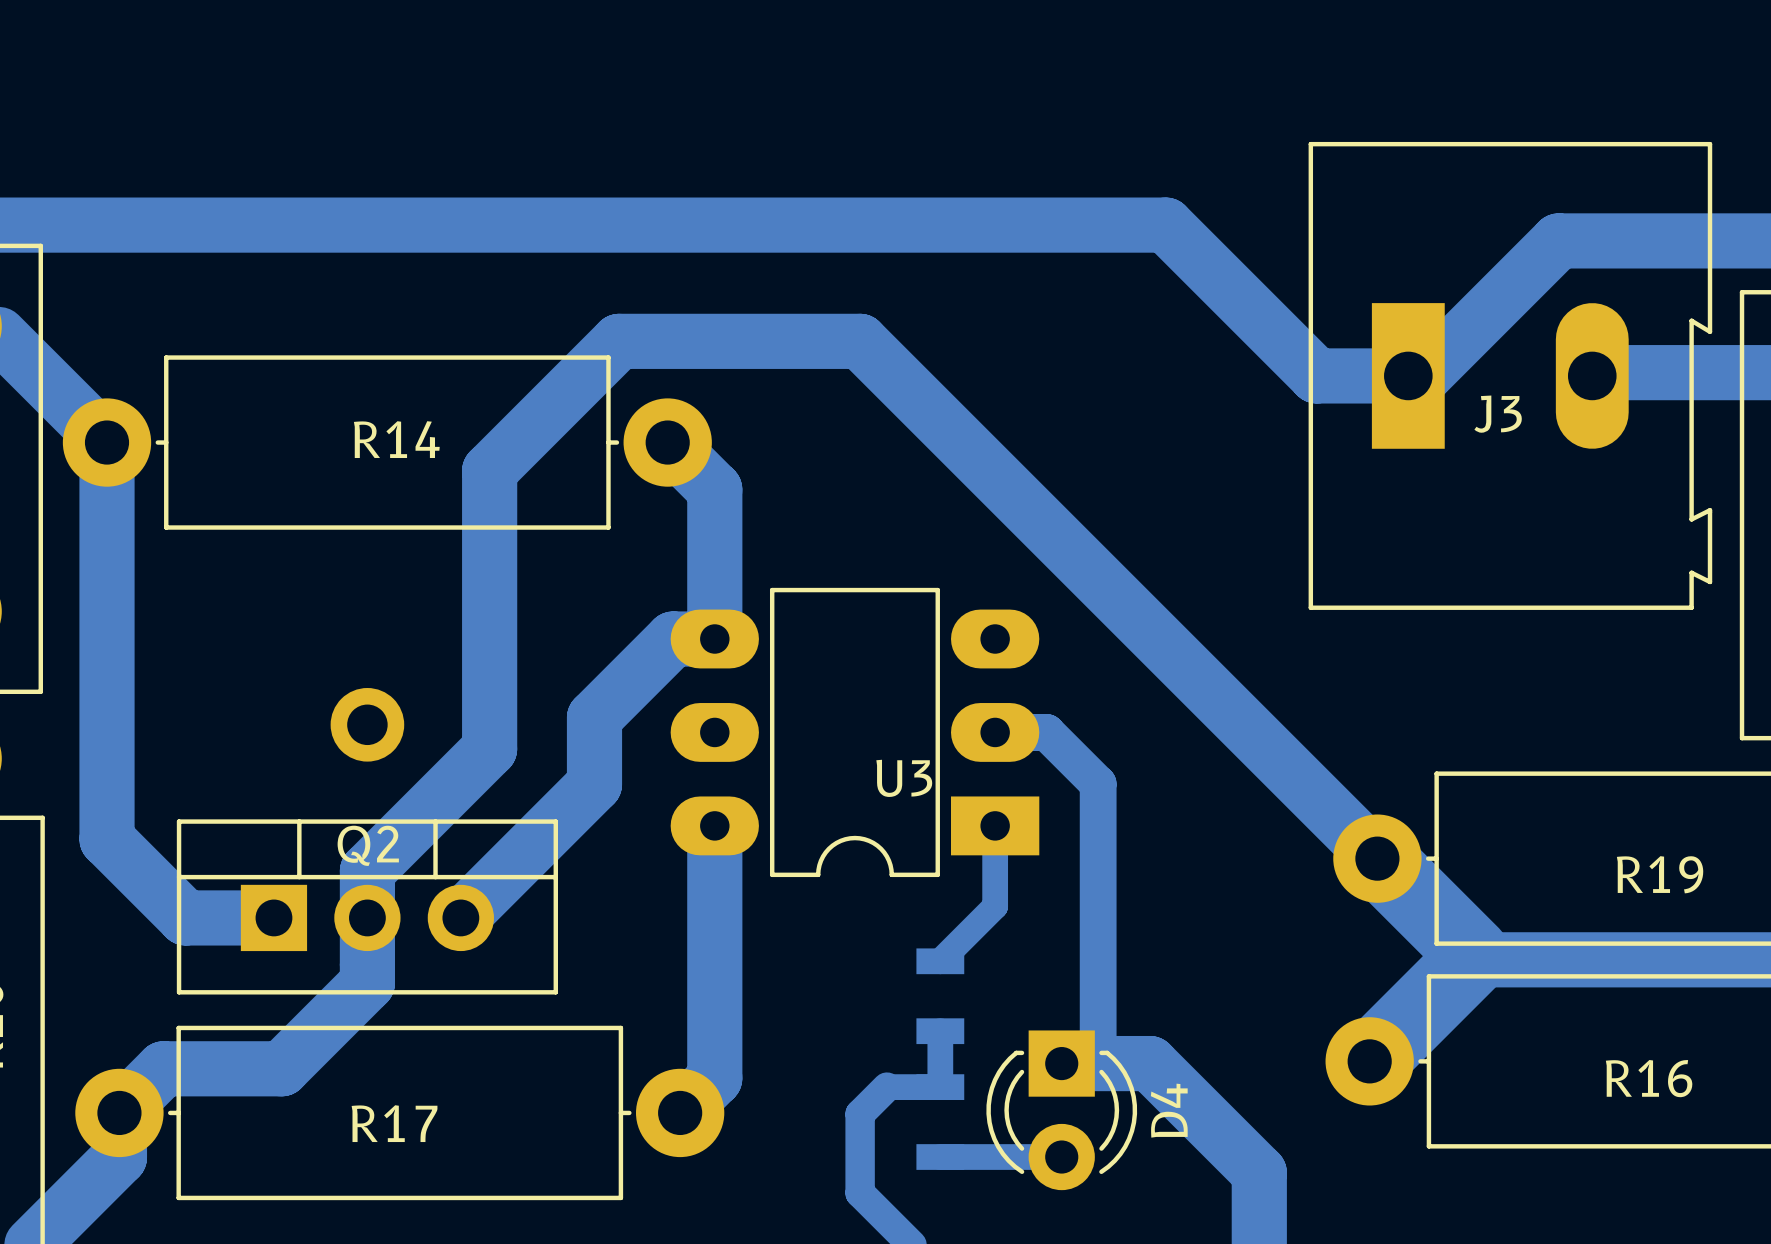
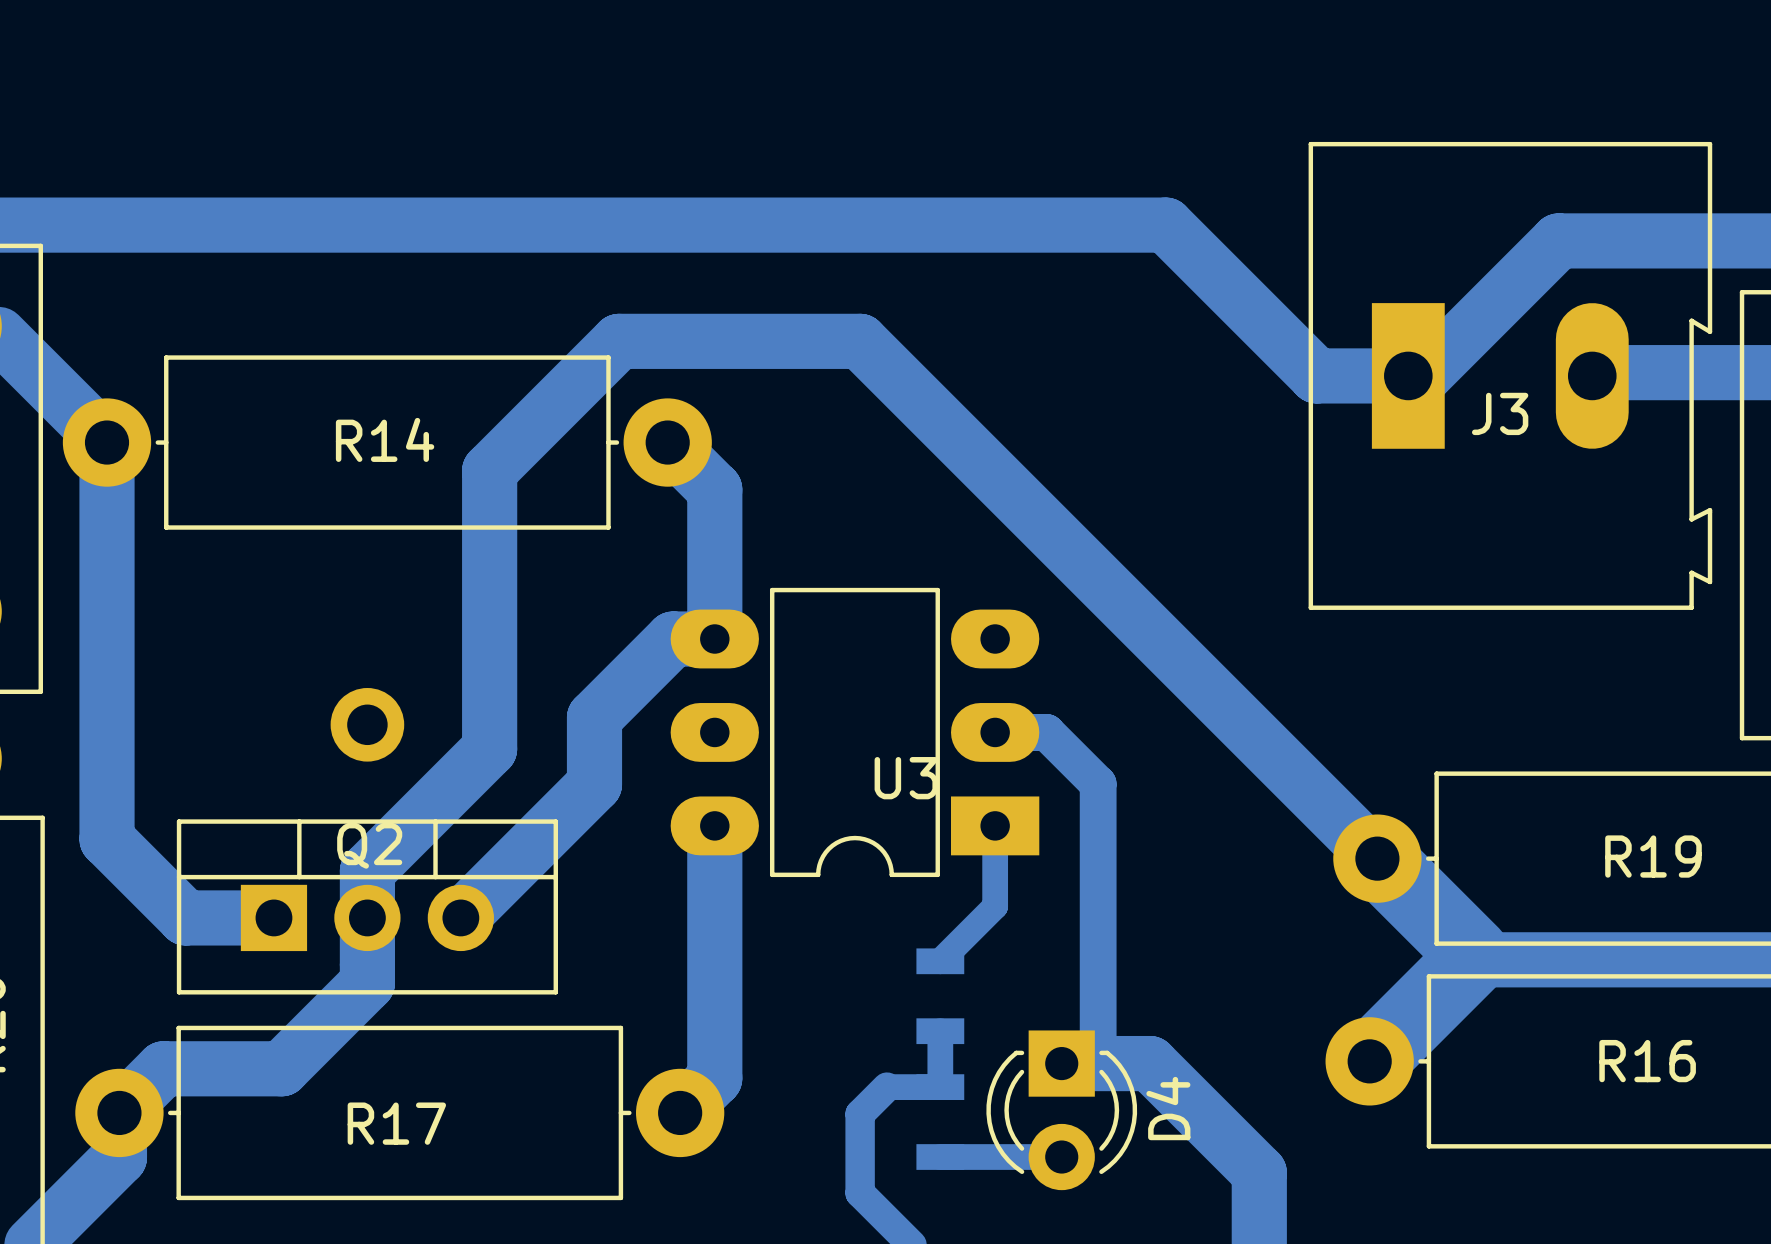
R14 name position: R14 (396, 439) -> R14 (385, 439)
R19 name position: R19 (1660, 874) -> R19 (1653, 856)
R16 name position: R16 (1649, 1078) -> R16 (1647, 1061)

